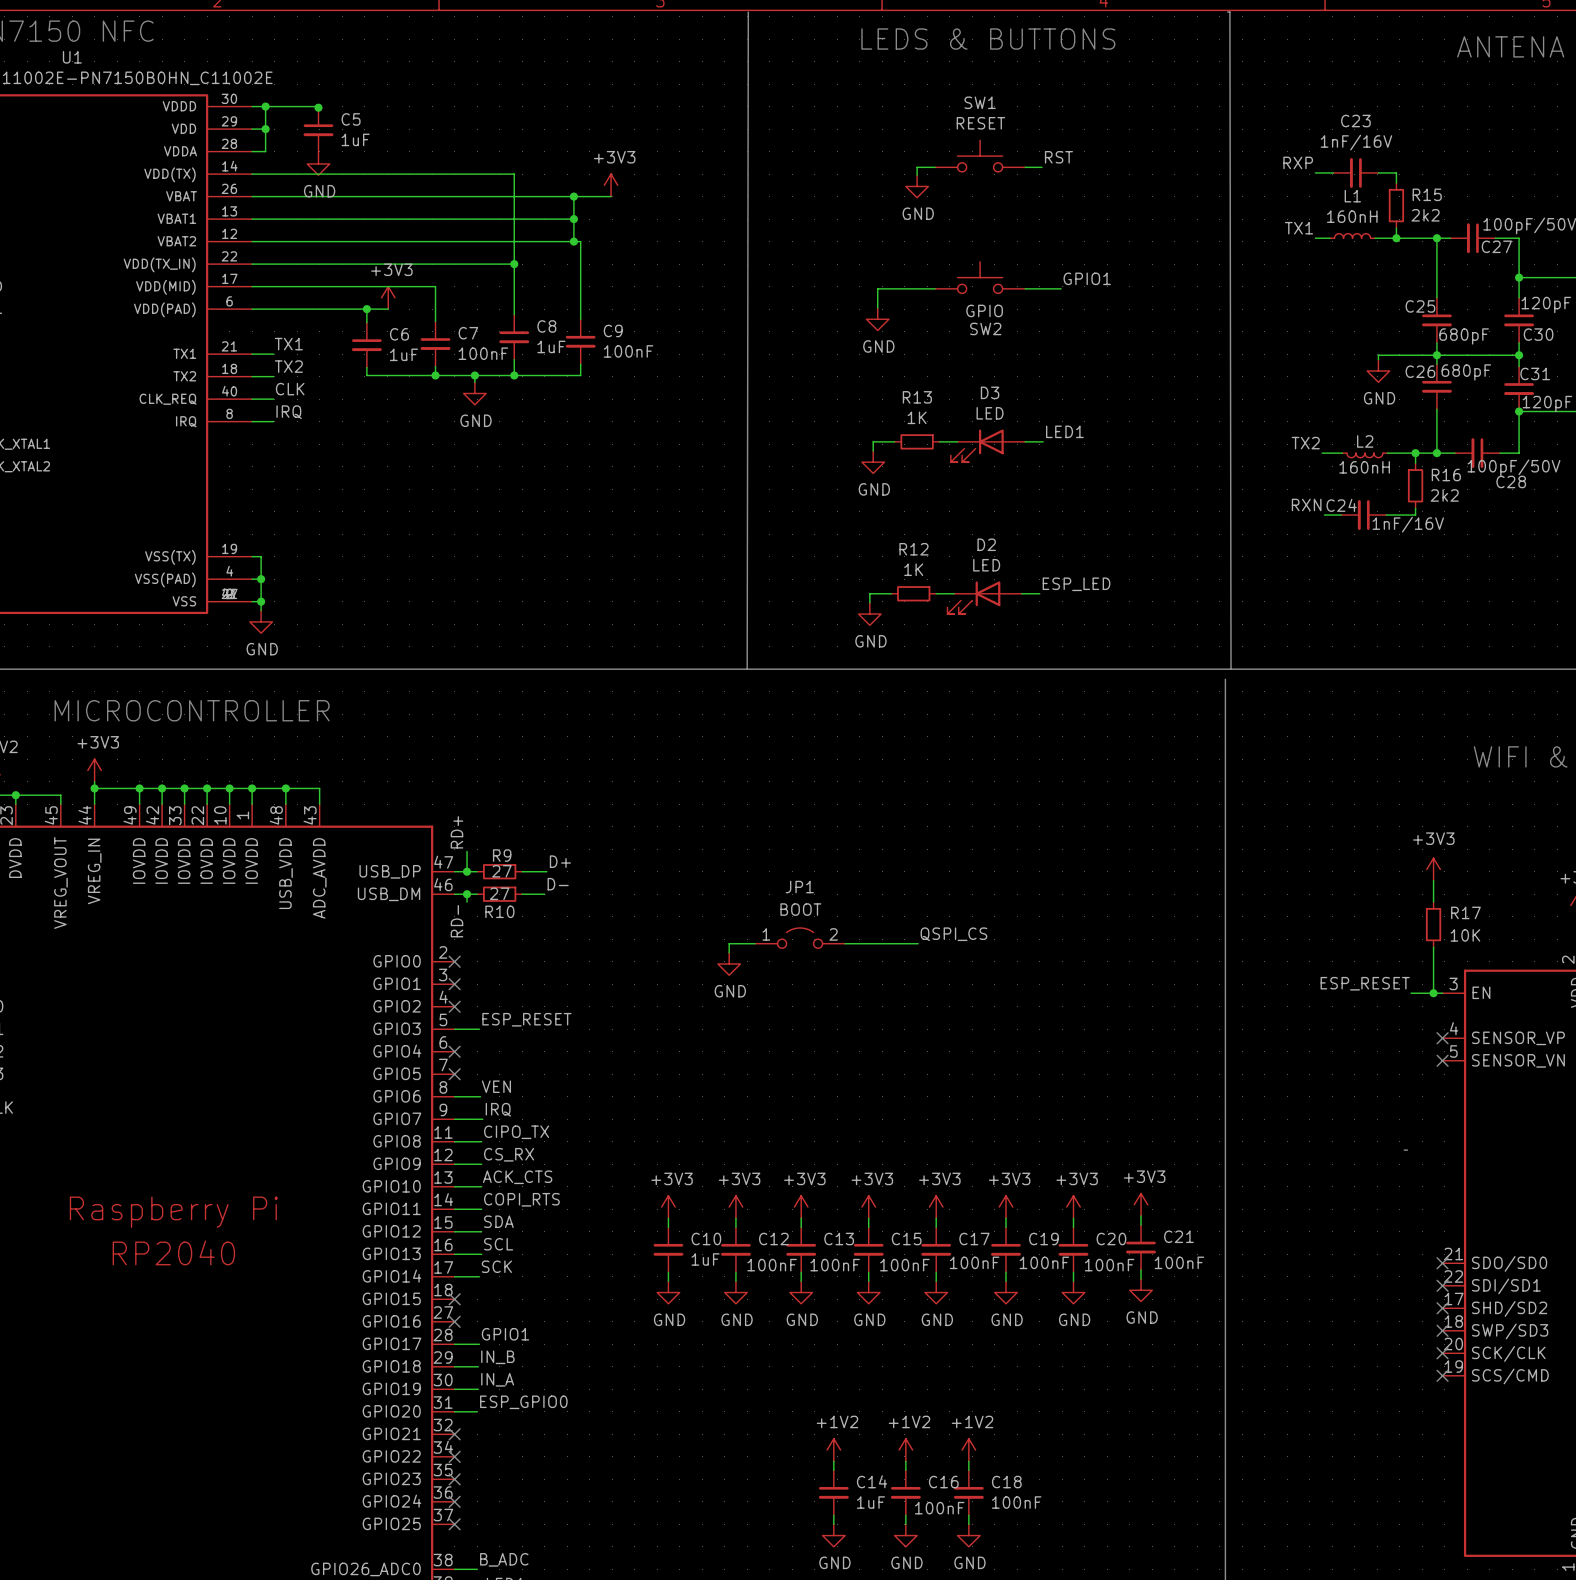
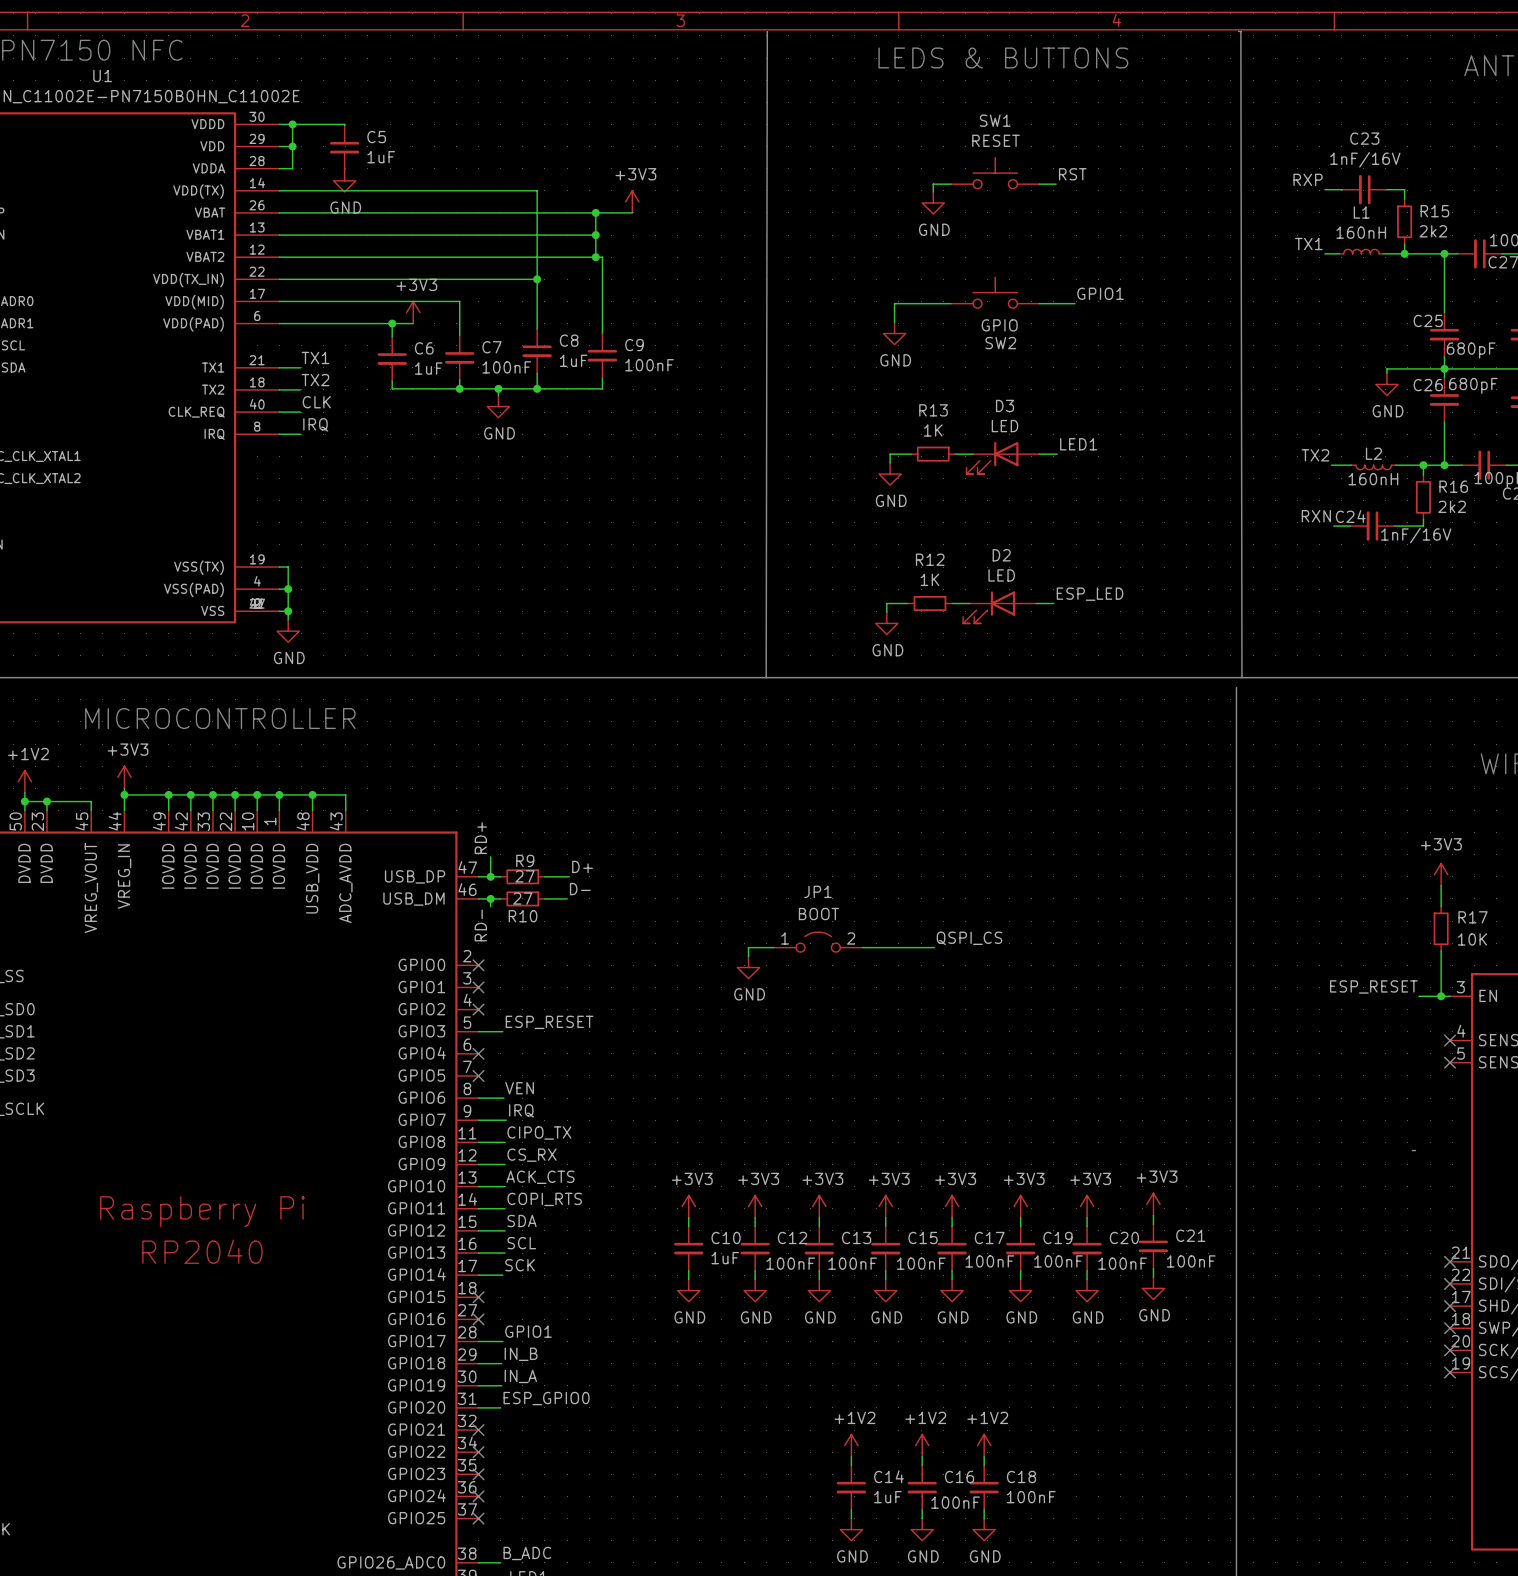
junction: (318, 107) -> none

